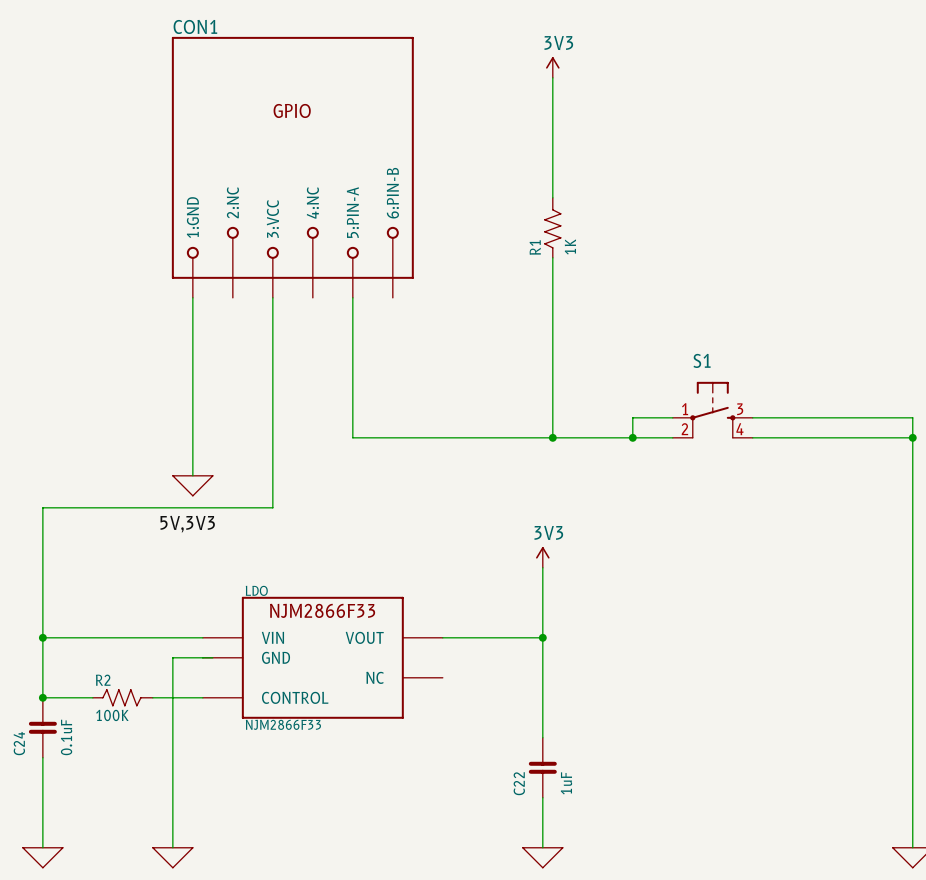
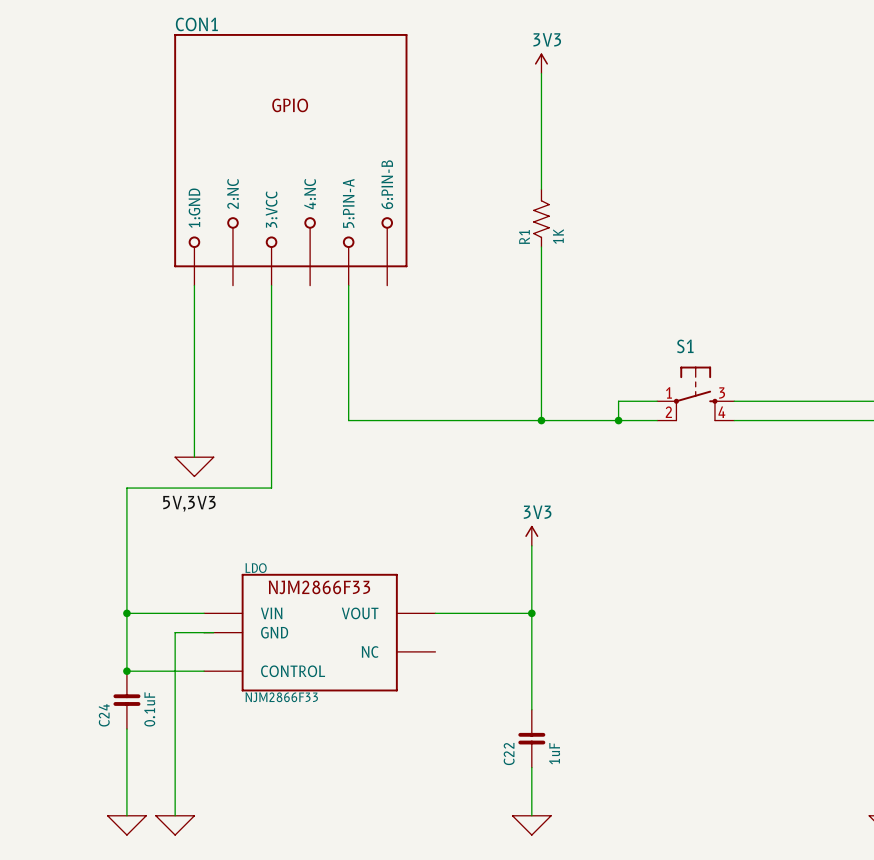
wire: (122, 507) (42, 507) (42, 697) (92, 697) -> (126, 488) (126, 671) (155, 671)
wire: (42, 637) (122, 637) -> none
junction: (42, 637) -> none
junction: none -> (126, 613)
junction: (42, 697) -> none
R2: 100K (122, 697) -> none
junction: none -> (126, 671)
C24 position: (42, 727) -> (126, 700)
wire: (42, 757) (42, 847) -> (126, 729) (126, 815)
power symbol position: (42, 857) -> (126, 825)

